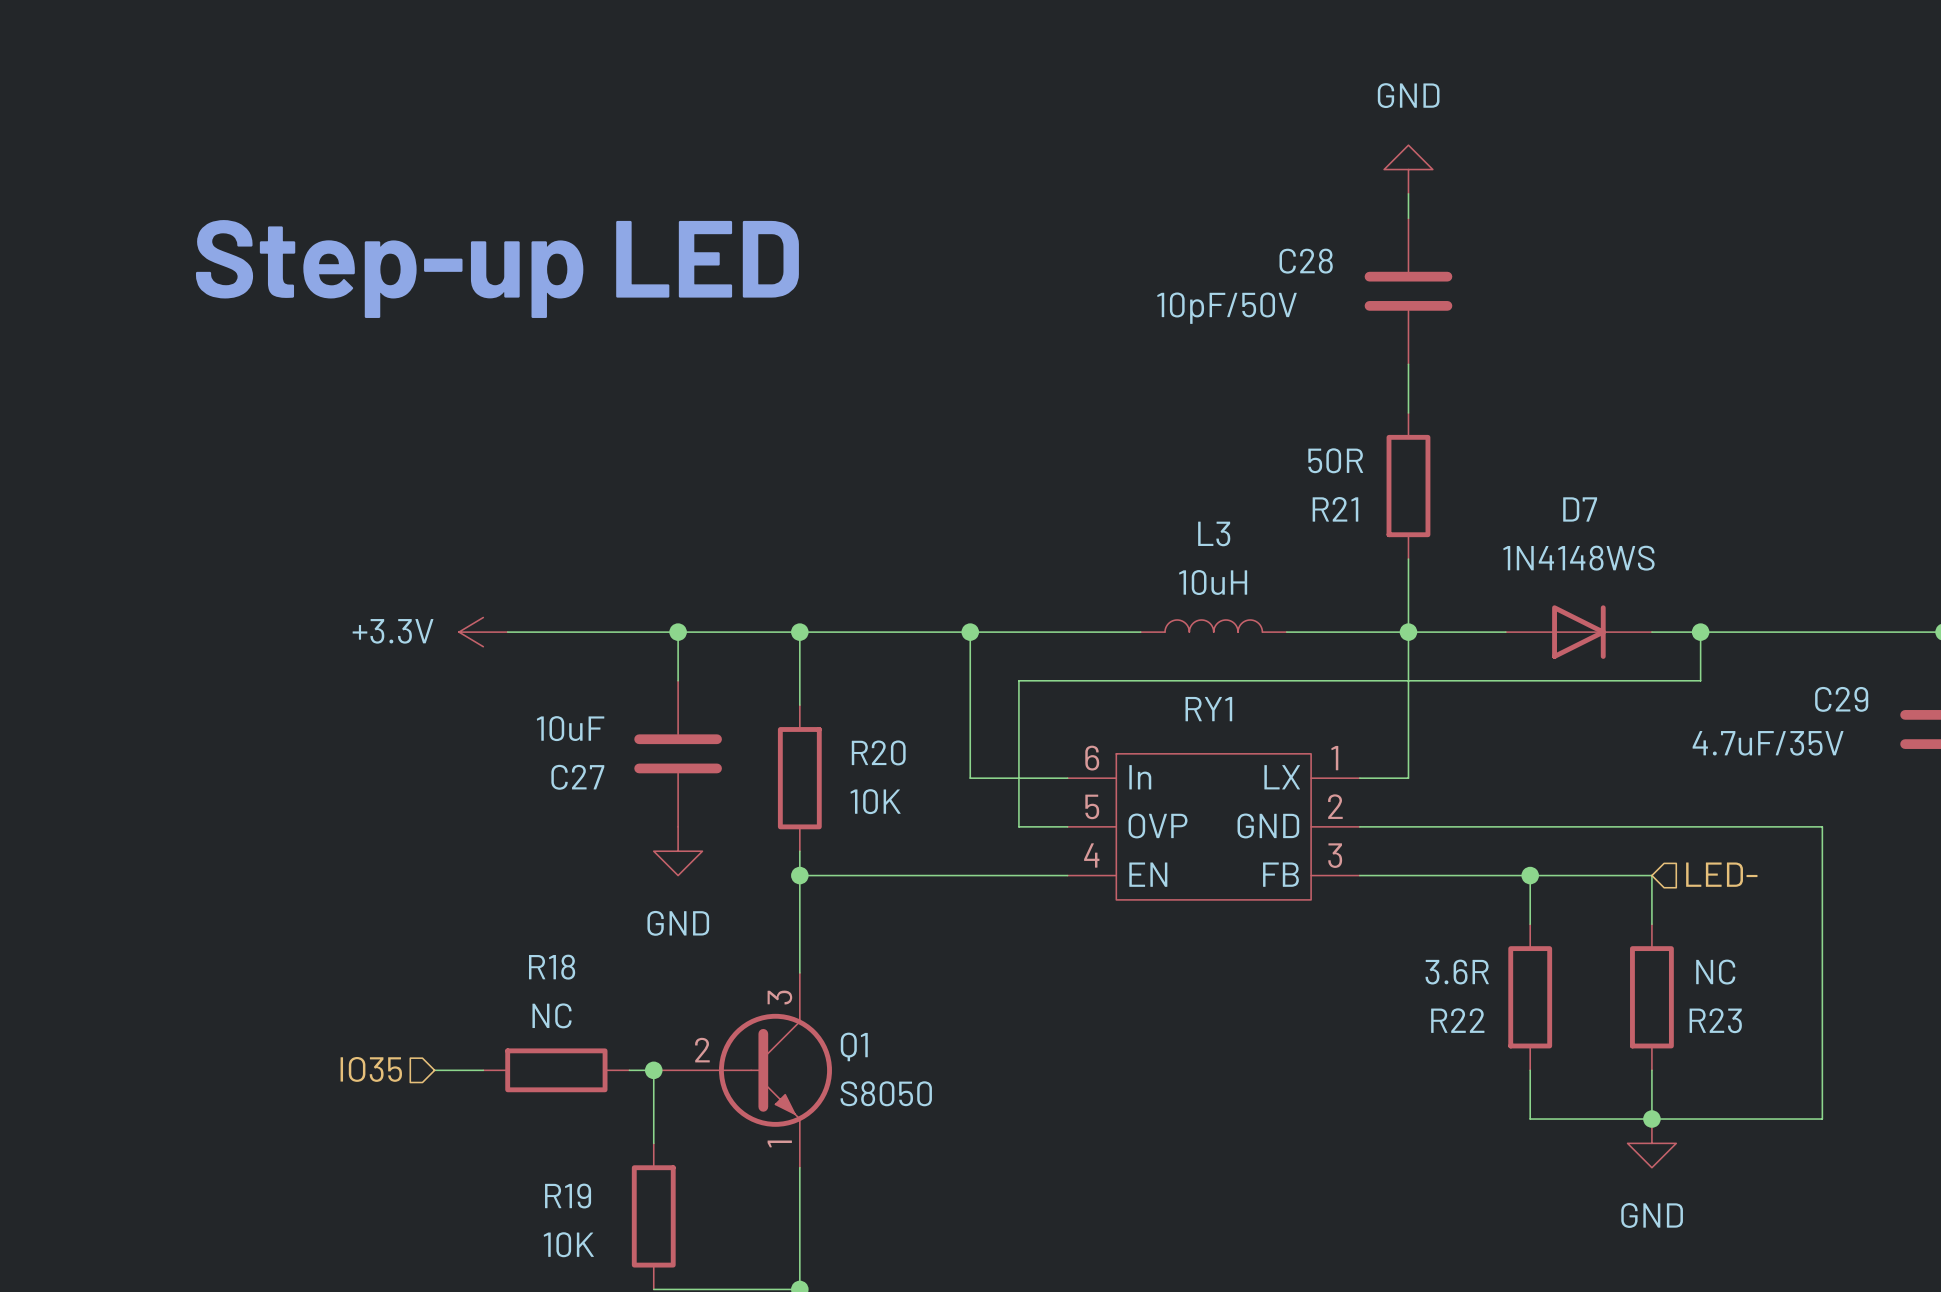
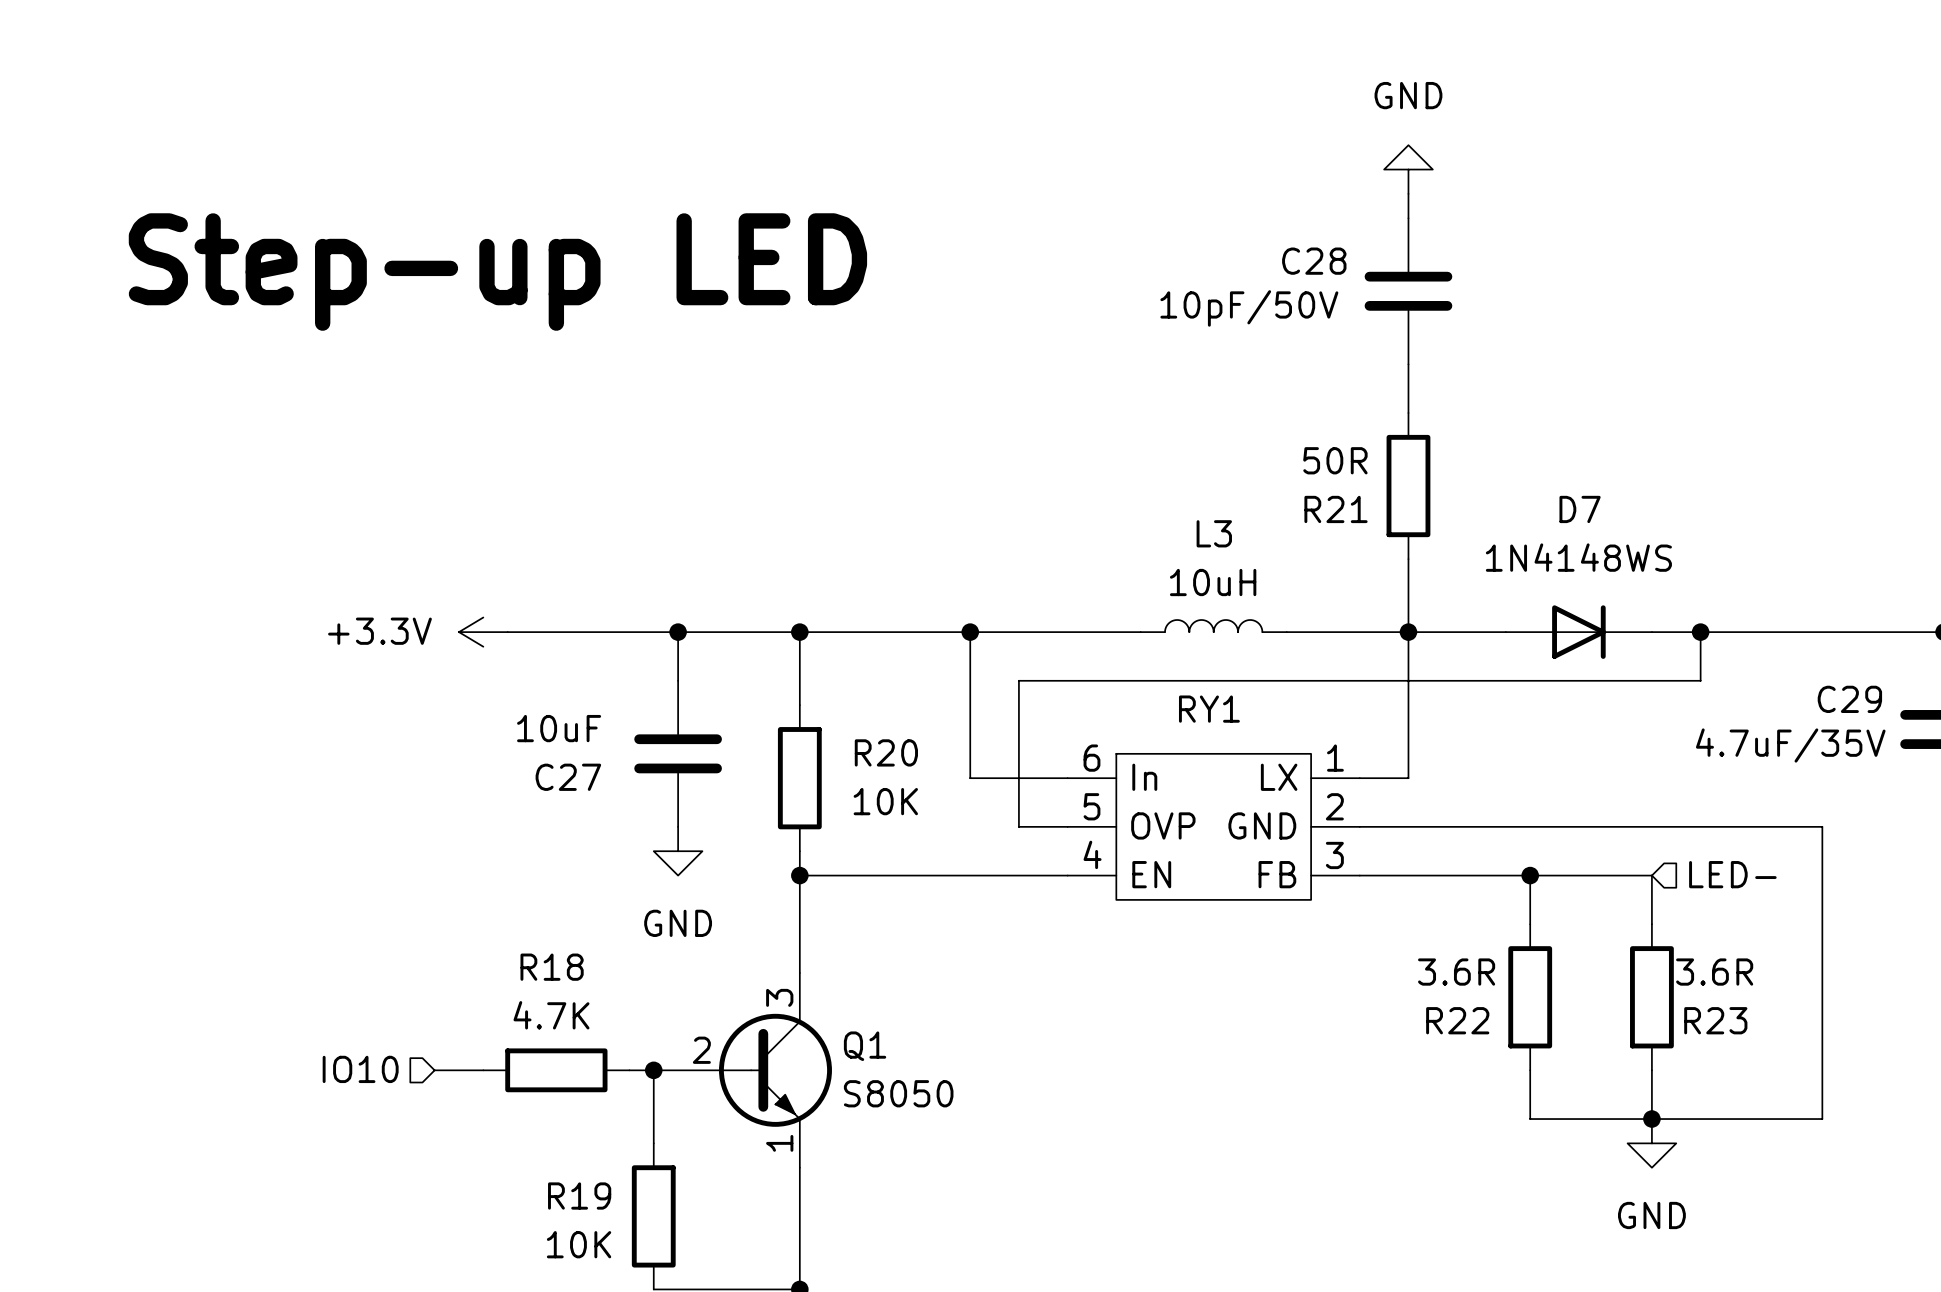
R23 value: NC (1715, 972) -> 3.6R (1714, 972)
R18 value: NC (552, 1015) -> 4.7K (551, 1015)
hierarchical label: IO35 (371, 1069) -> IO10 (360, 1069)

